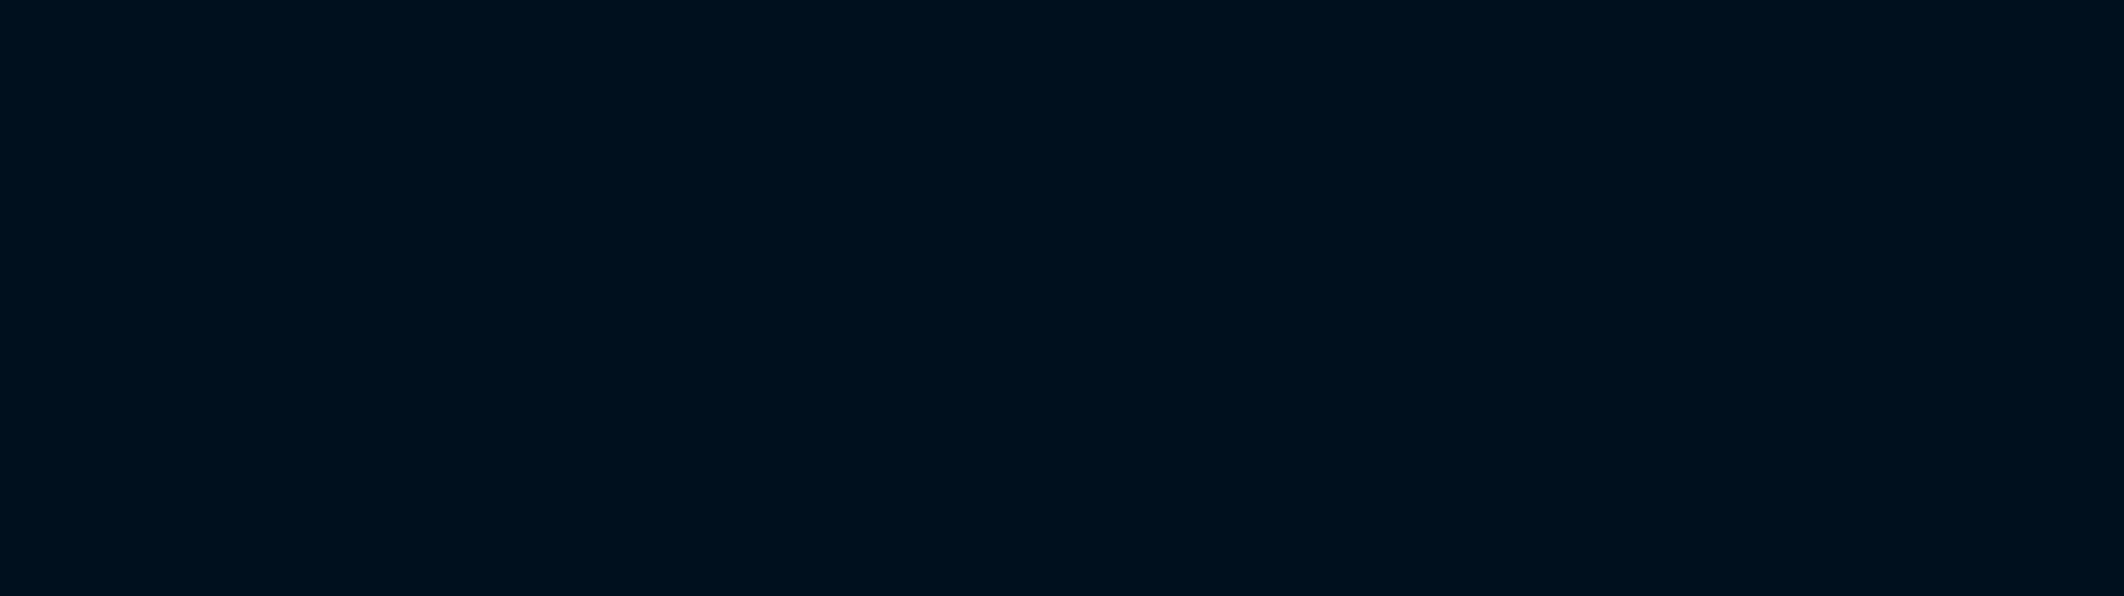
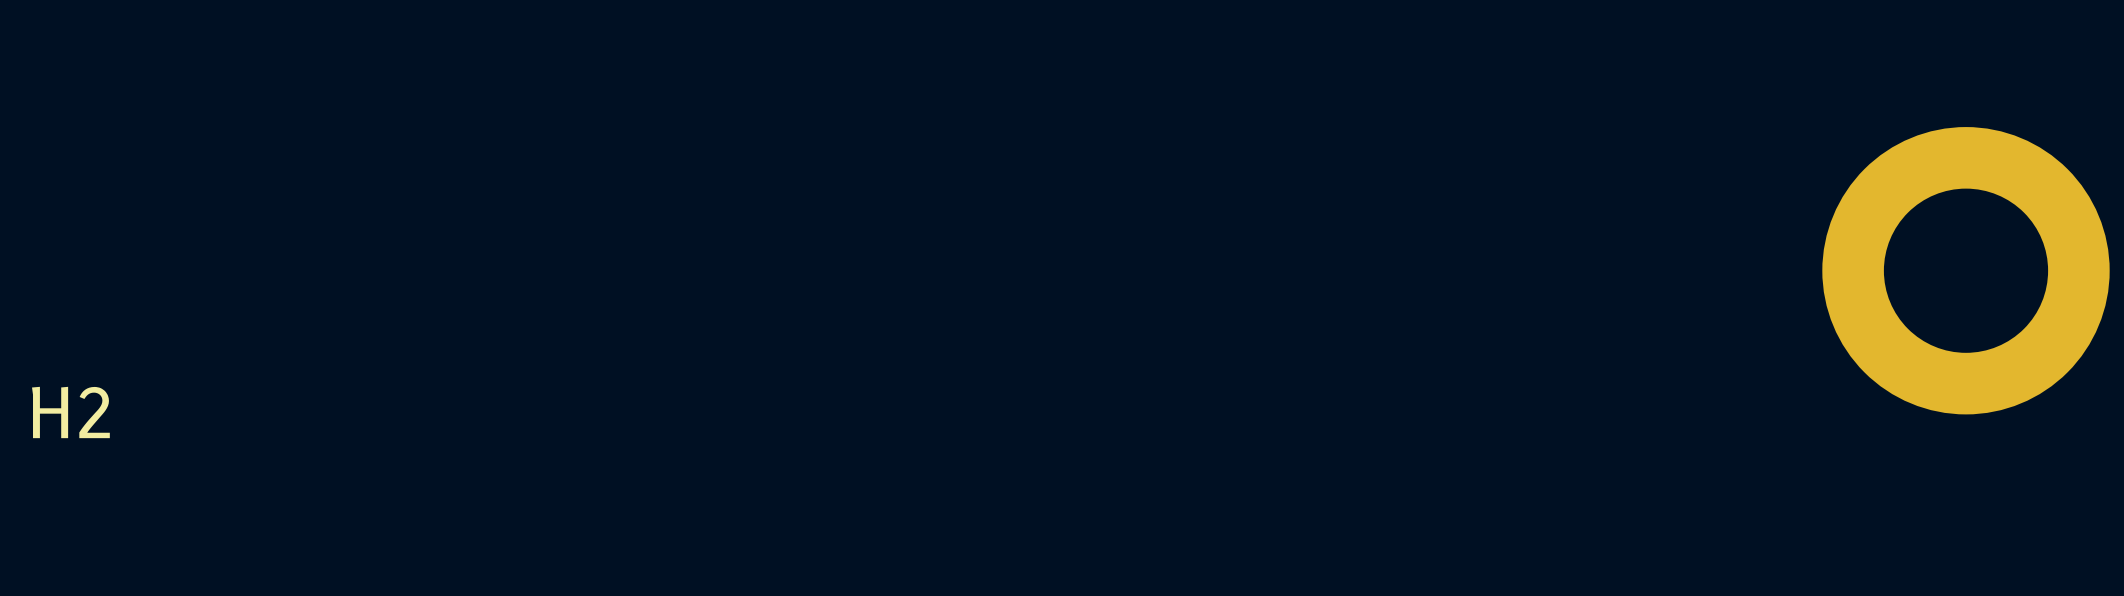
H2: none -> (1966, 270)

